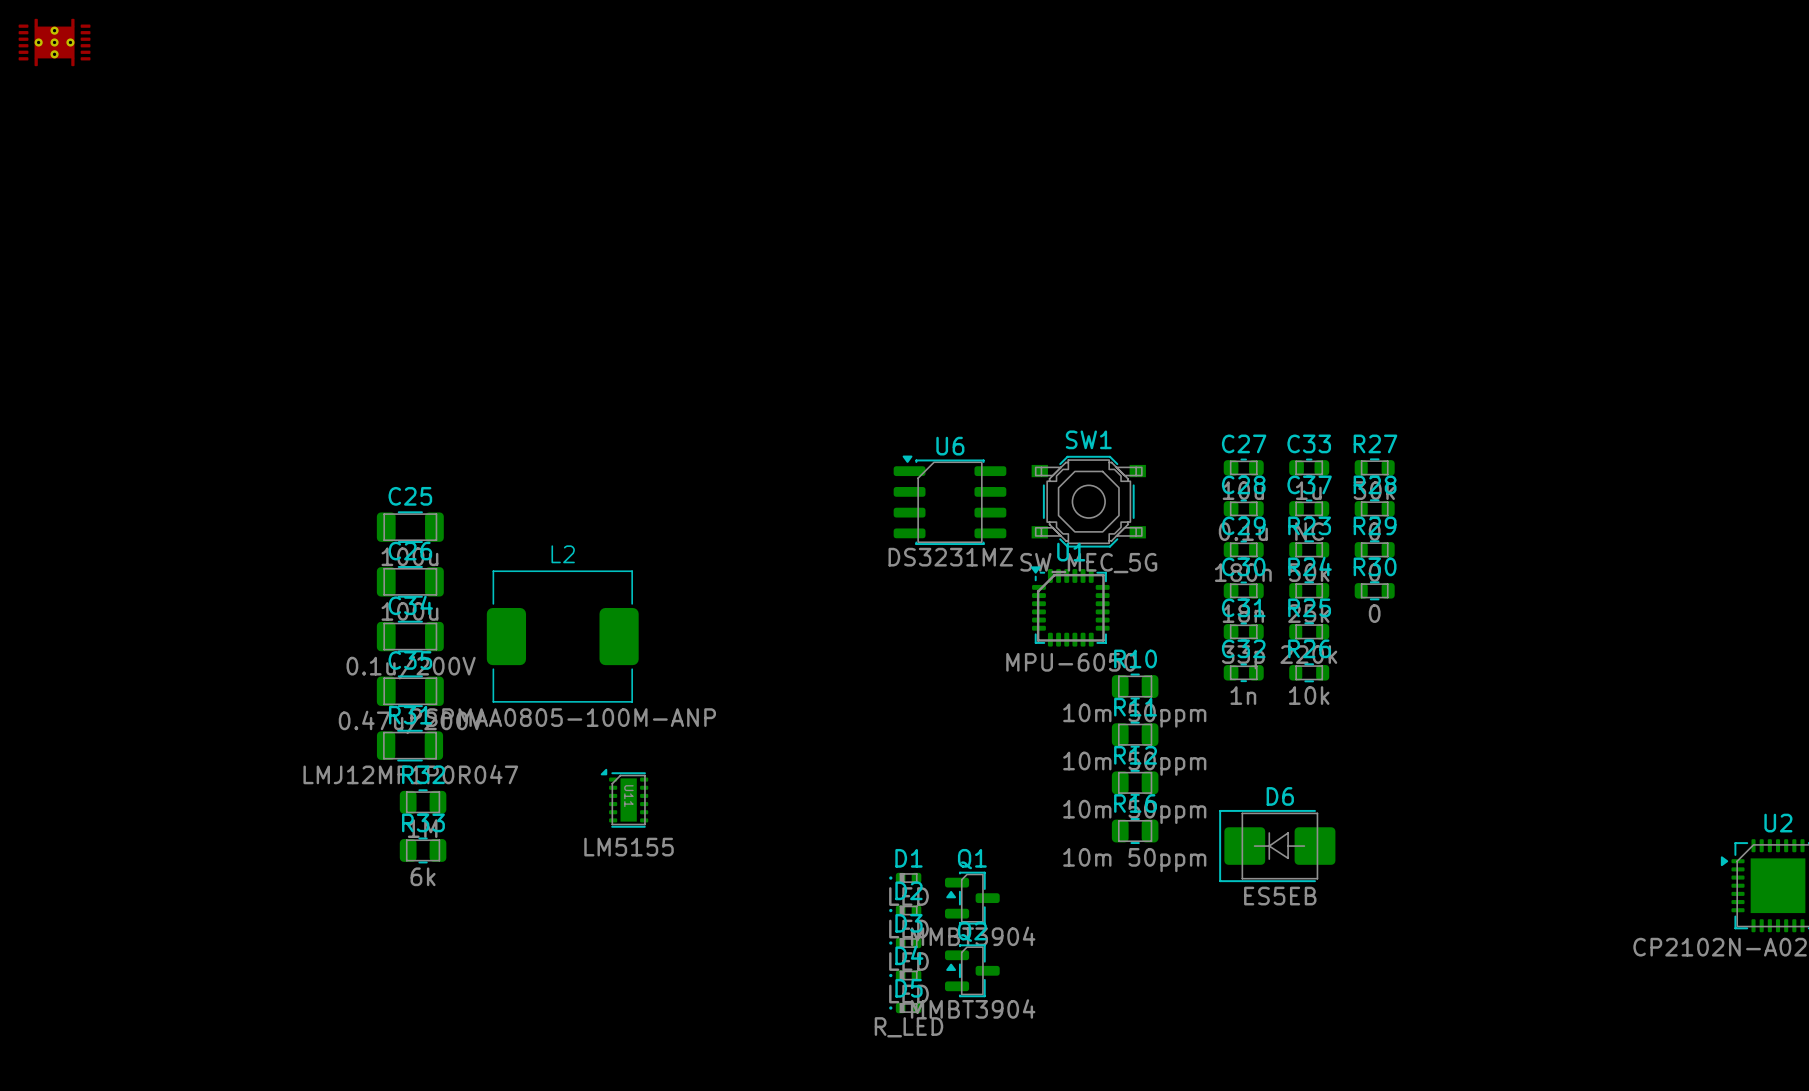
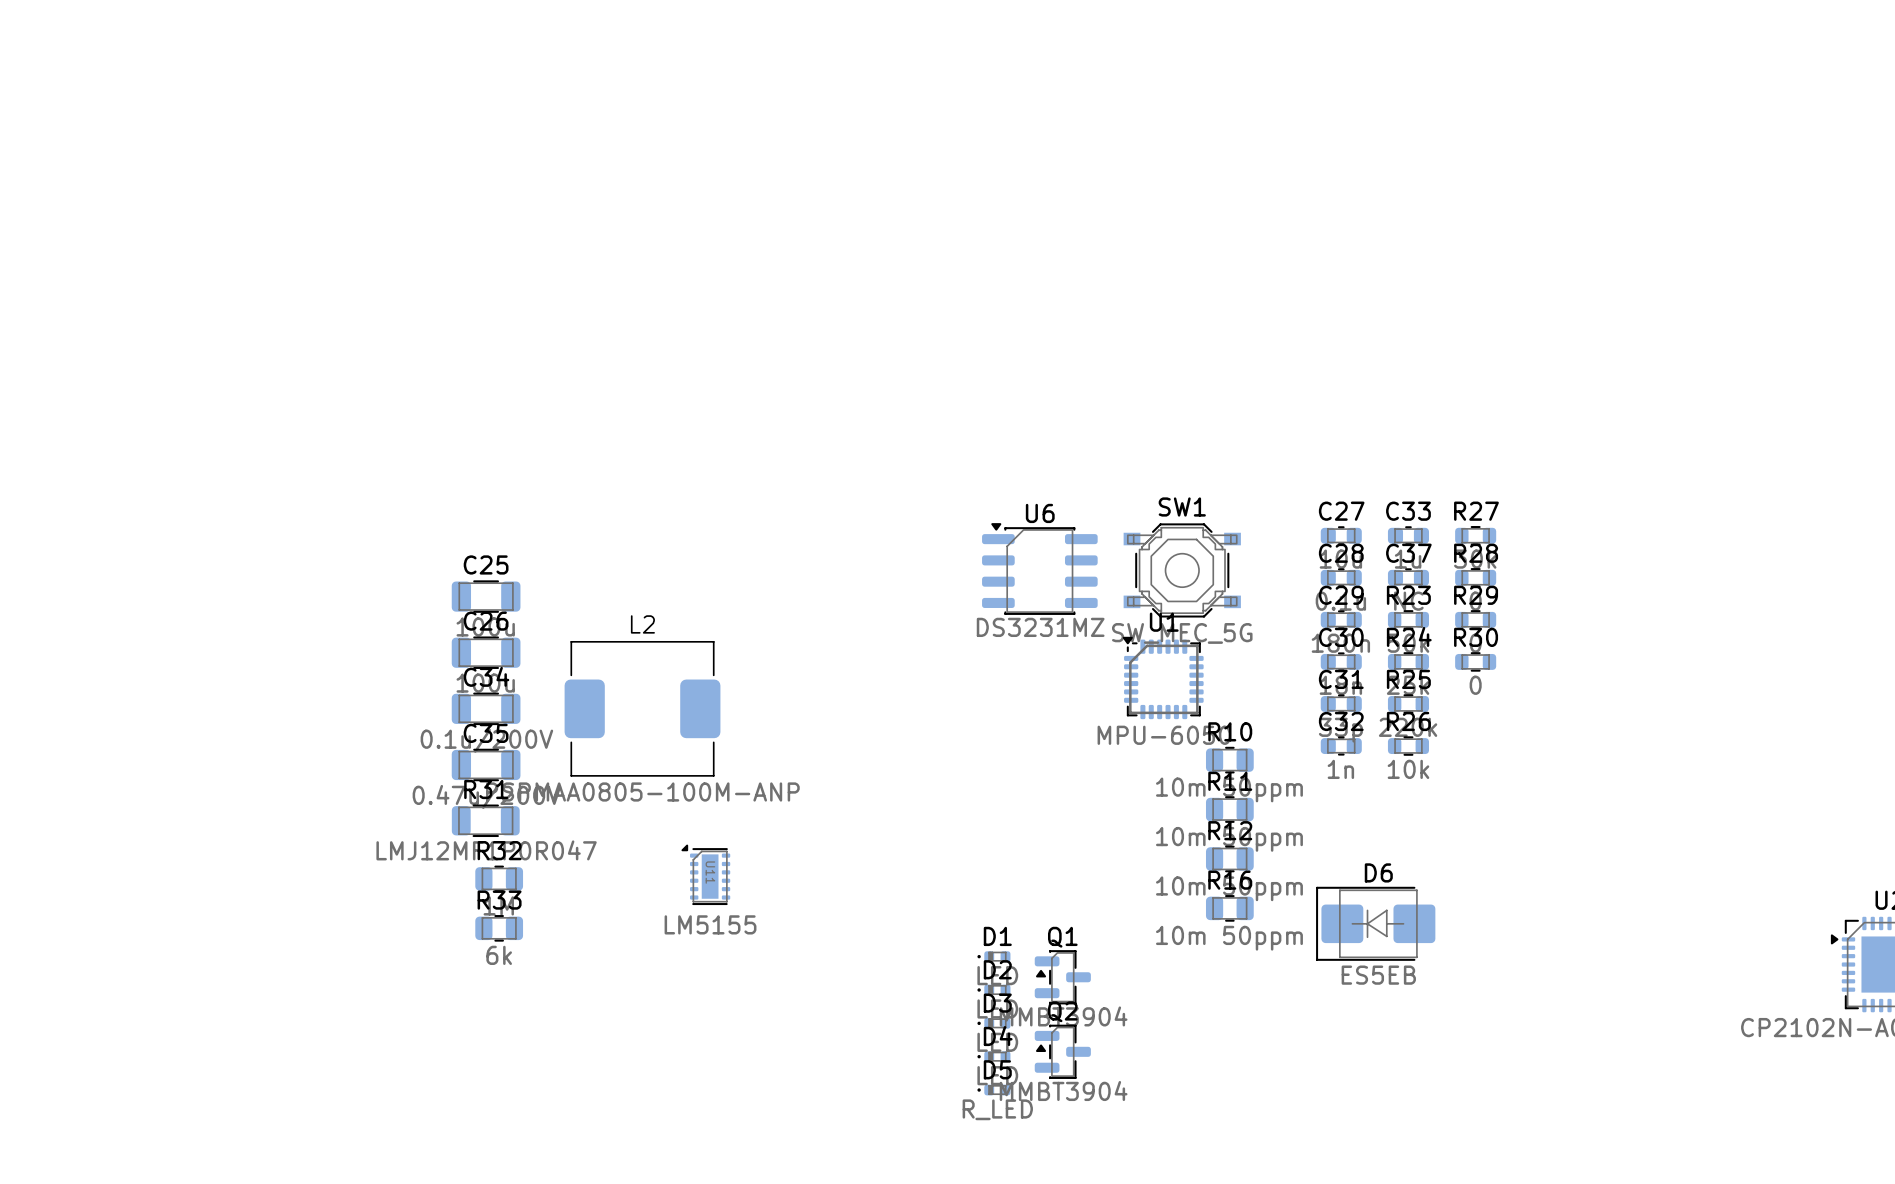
part: (54, 42) -> none

